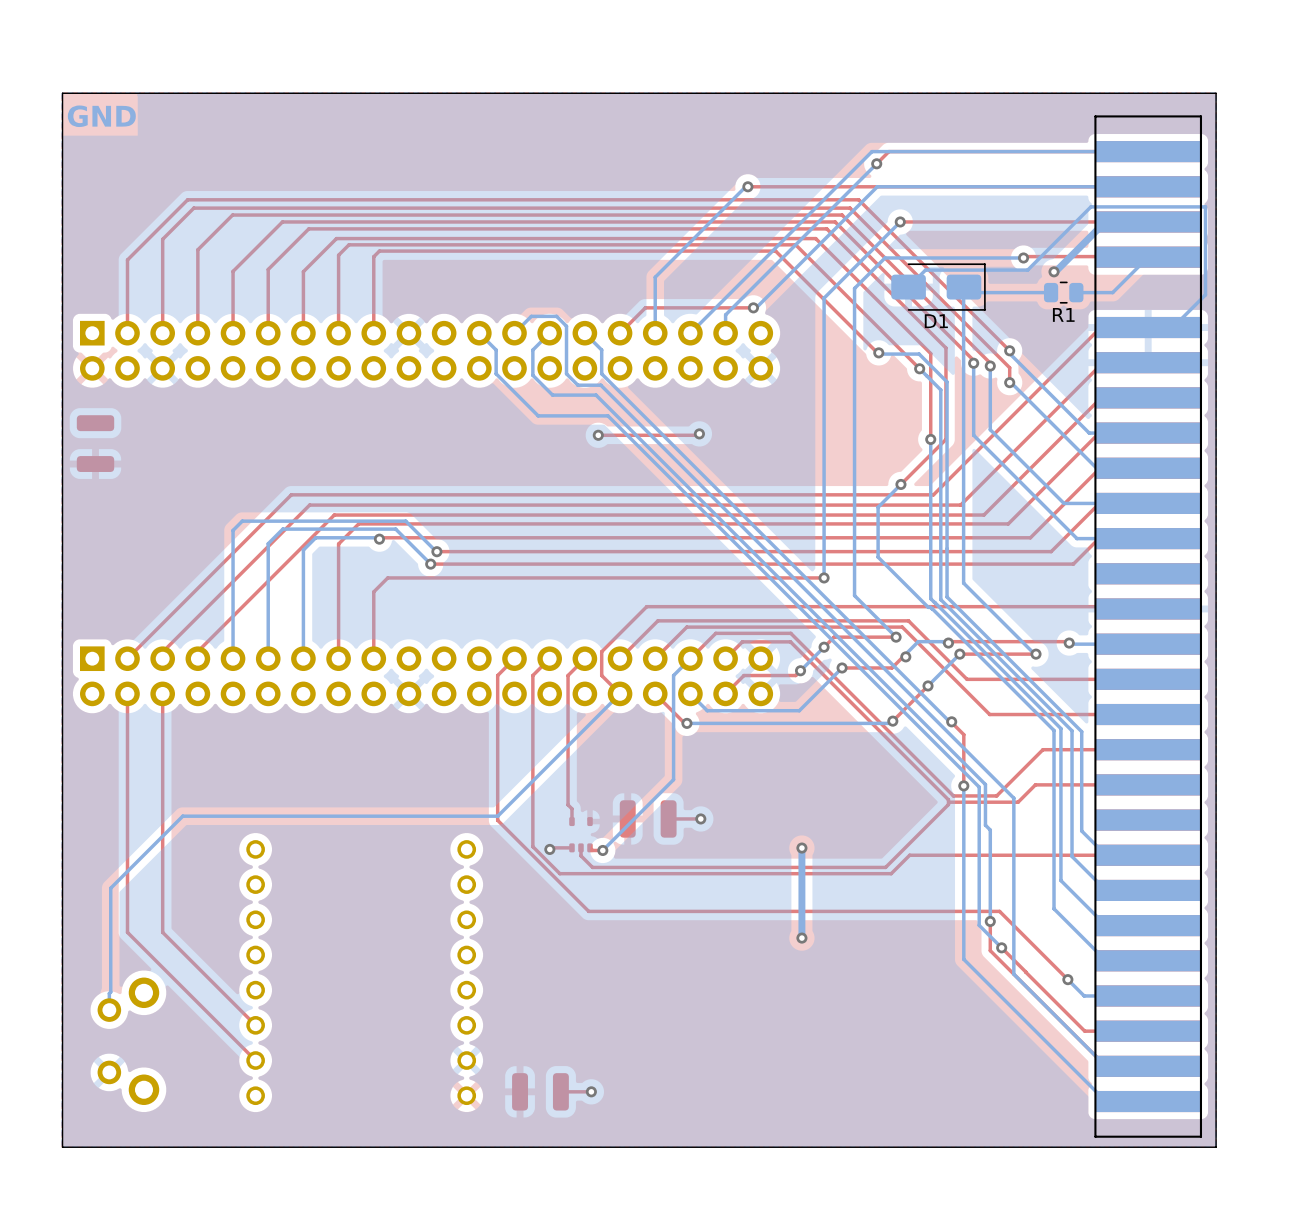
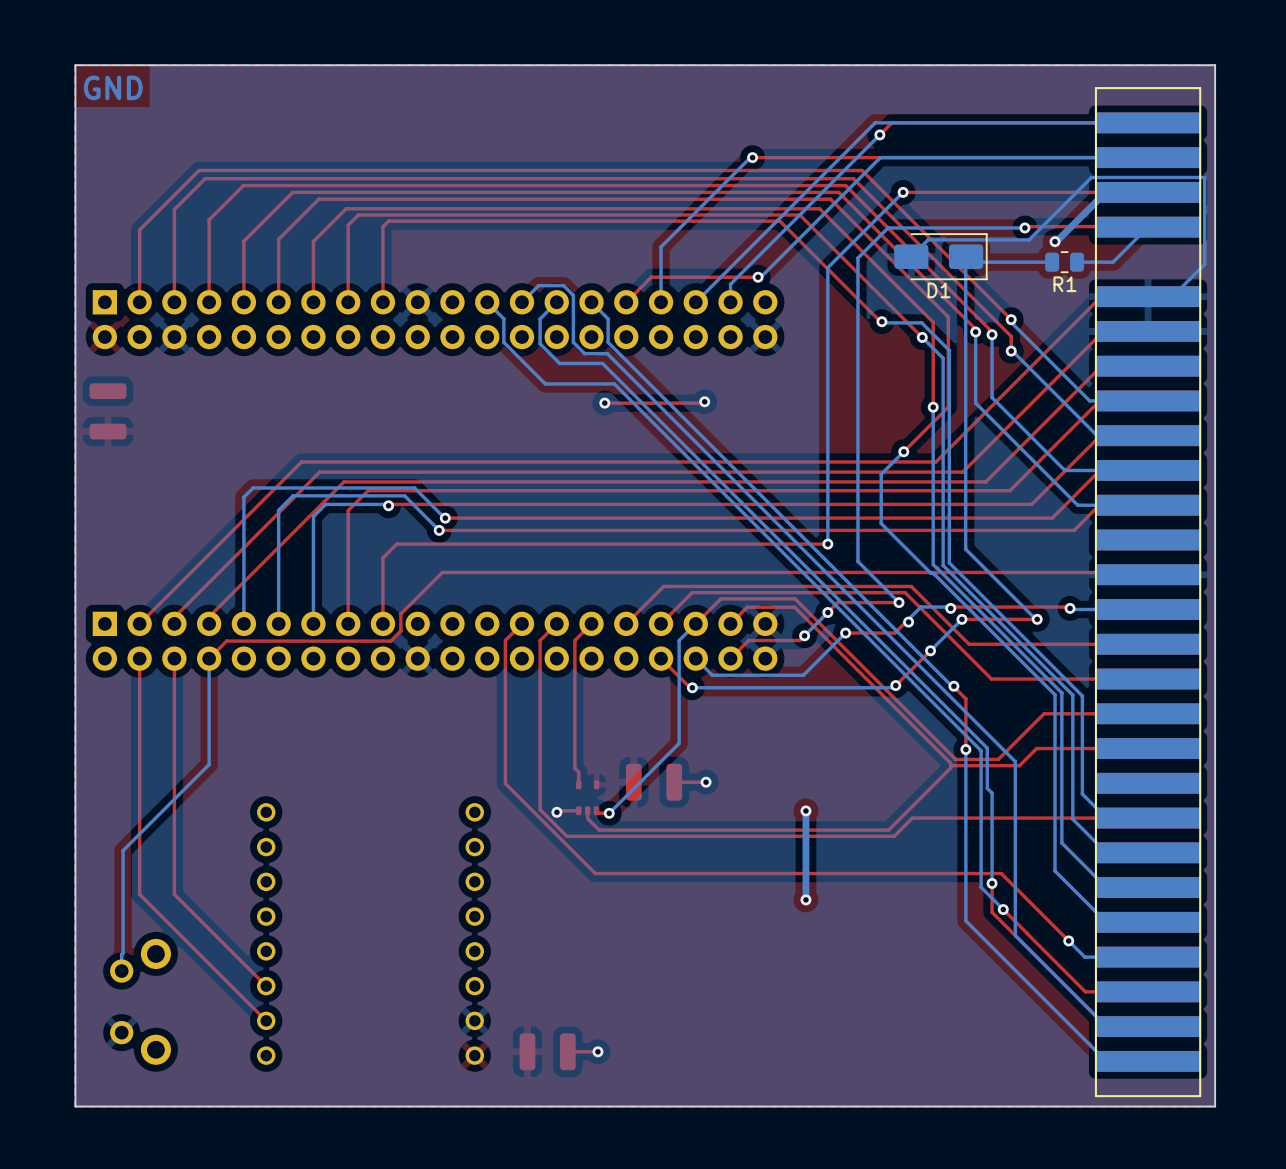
top track: (646, 606) (601, 651) (601, 675) (620, 693) -> (652, 572) (442, 572) (400, 614) (400, 630) (390, 641) (226, 641) (209, 658)
bottom track: (620, 693) (497, 816) (182, 816) -> (209, 658) (209, 764) (194, 779)

